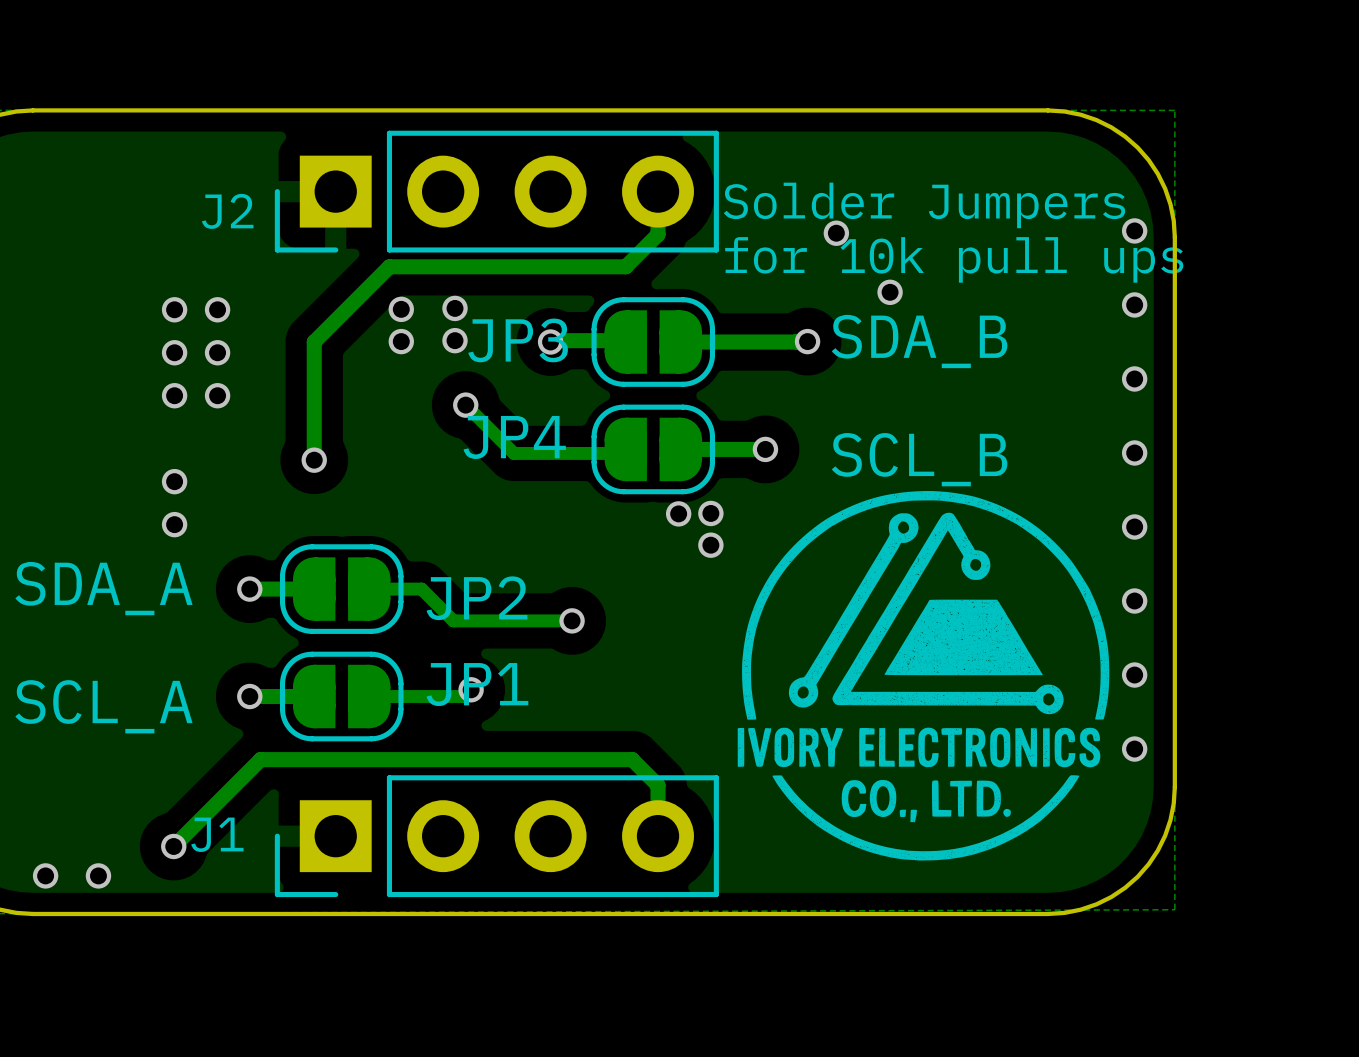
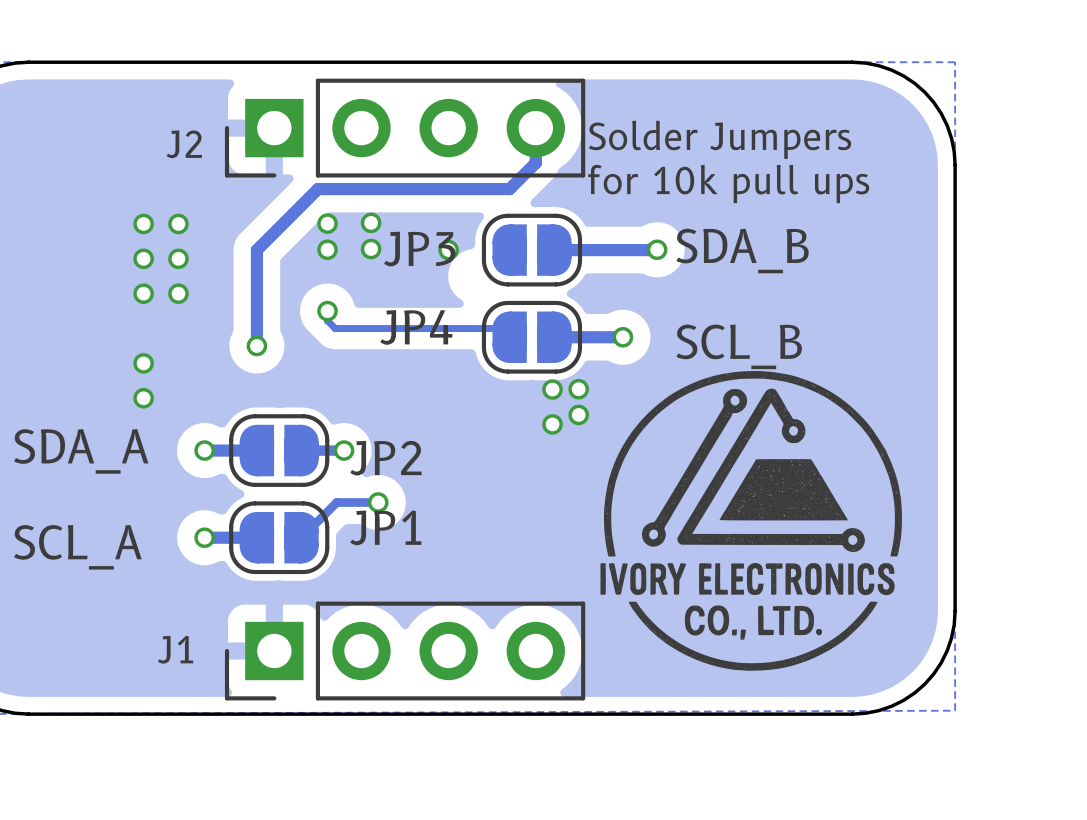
via: (1134, 230) -> none
via: (836, 233) -> none
via: (890, 292) -> none
via: (1134, 304) -> none
track: (625, 342) (550, 342) -> none
via: (1134, 378) -> none
track: (465, 405) (514, 453) (621, 453) (625, 449) -> none
via position: (465, 405) -> (327, 311)
track: none -> (327, 311) (327, 320) (335, 328) (509, 328)
via: (1134, 452) -> none
via: (1134, 527) -> none
via: none -> (552, 424)
track: (421, 589) (453, 620) (572, 620) -> none
via: none -> (344, 450)
via: (1134, 601) -> none
via: (572, 620) -> none
via: (1134, 675) -> none
track: (471, 689) (464, 696) (369, 696) -> (378, 502) (336, 502) (301, 537)
via position: (471, 689) -> (378, 502)
via: (1134, 749) -> none
track: (658, 836) (658, 785) (632, 759) (260, 759) (173, 846) -> none
via: (173, 846) -> none
via: (45, 875) -> none
via: (98, 875) -> none

